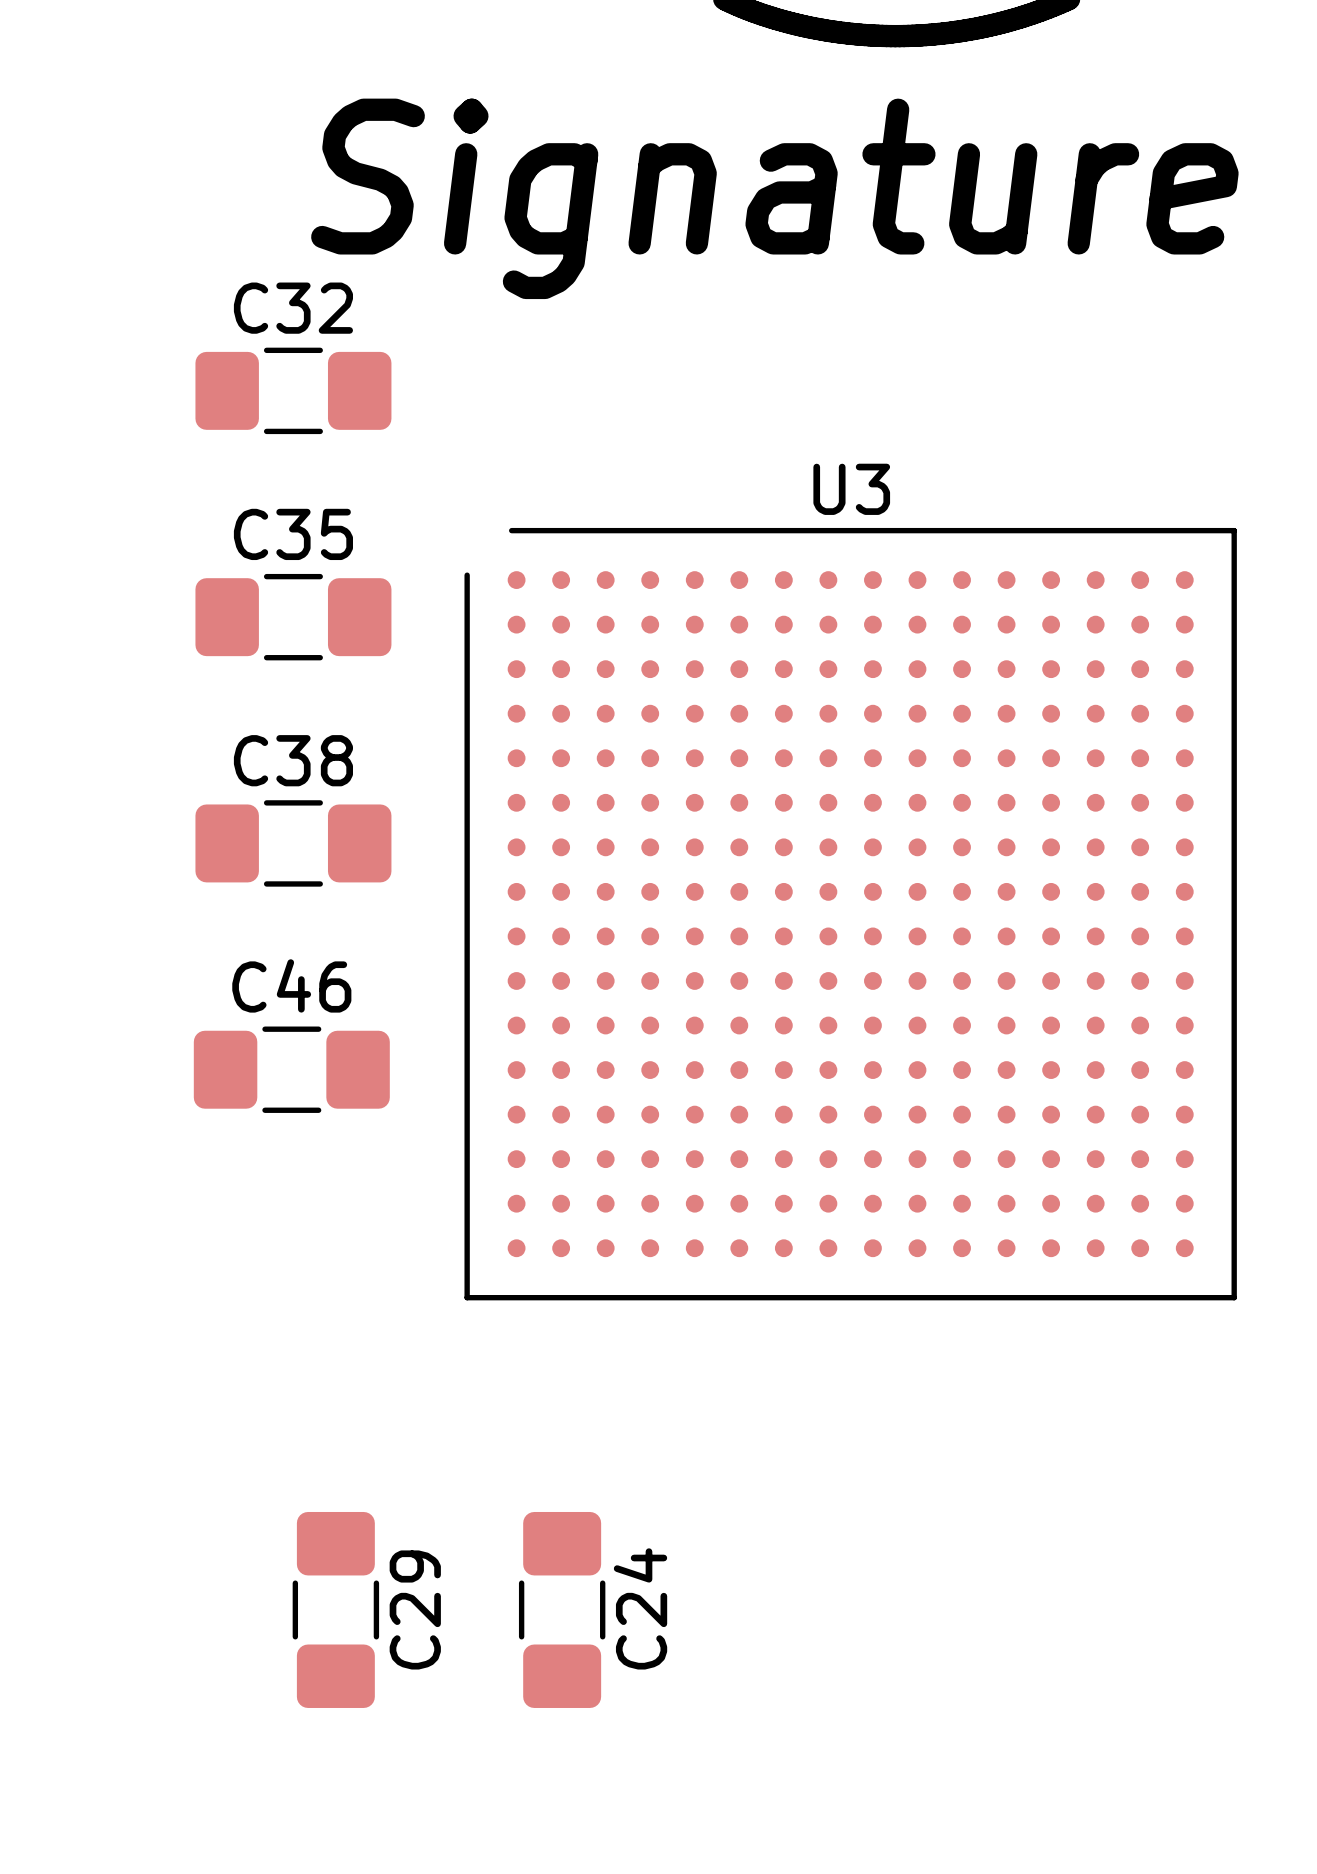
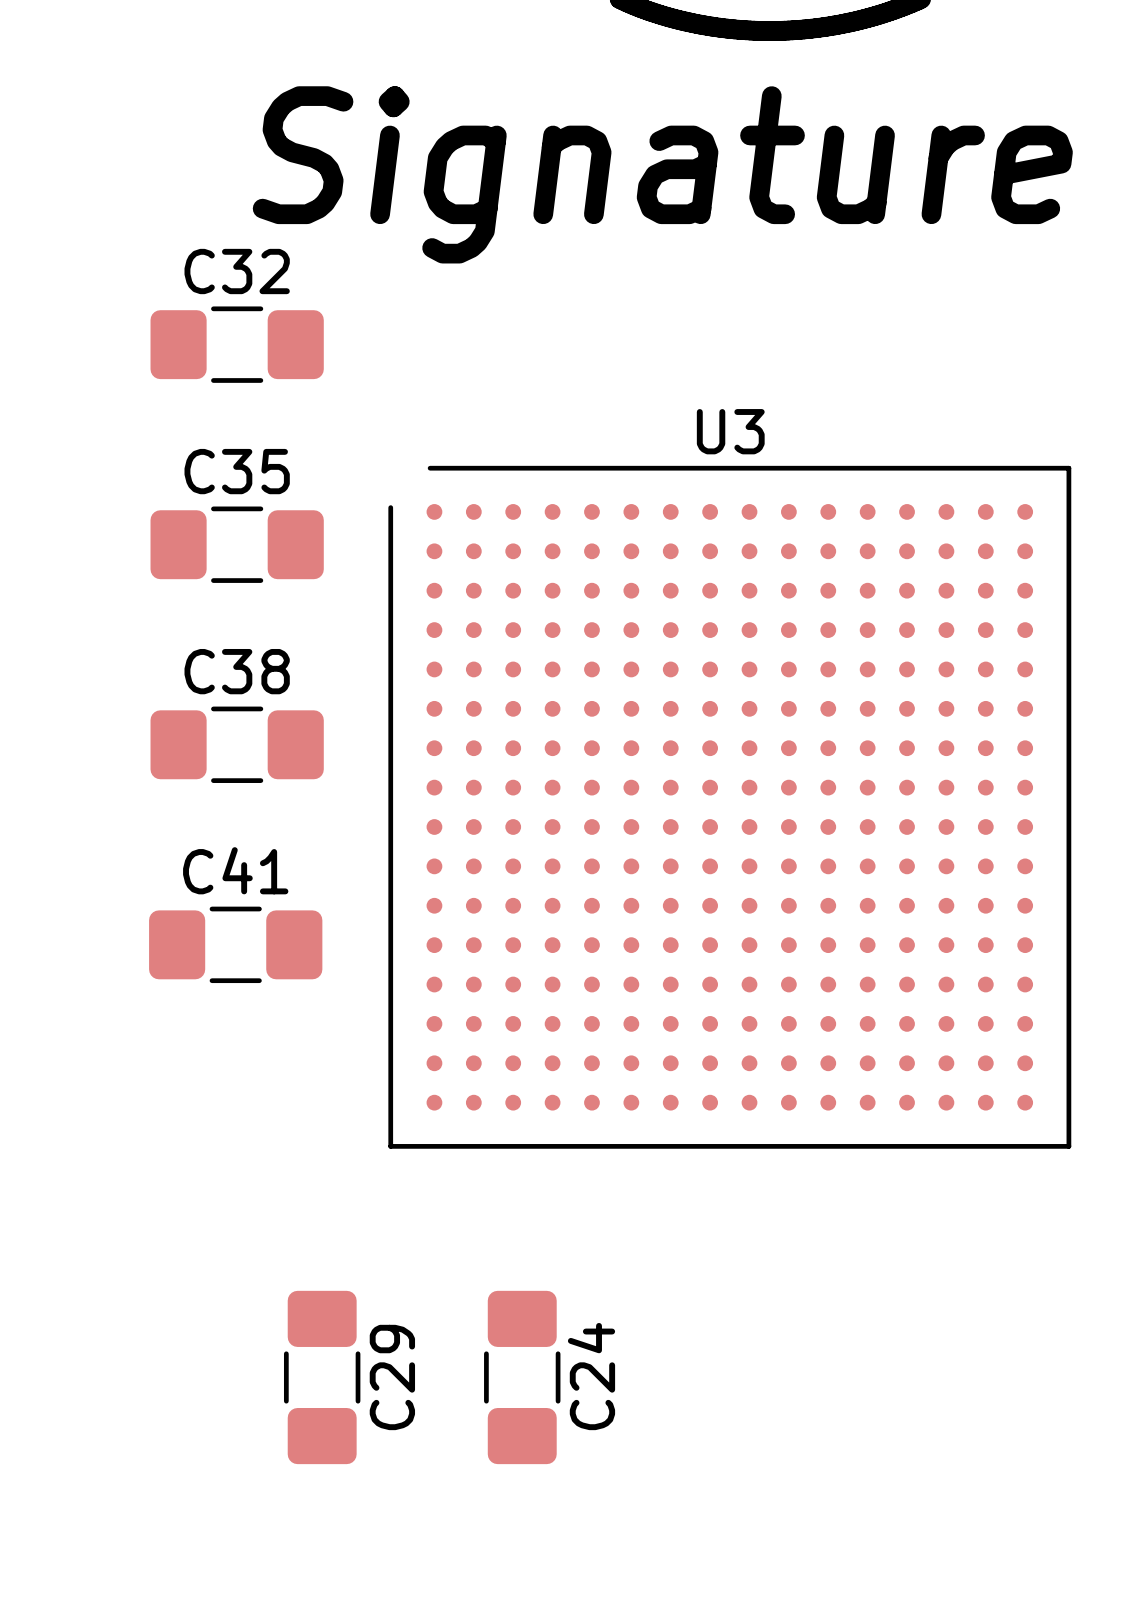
C46 name: C46 (291, 985) -> C41 (235, 870)
C29 position: (335, 1609) -> (322, 1377)
C24 position: (562, 1609) -> (522, 1377)

